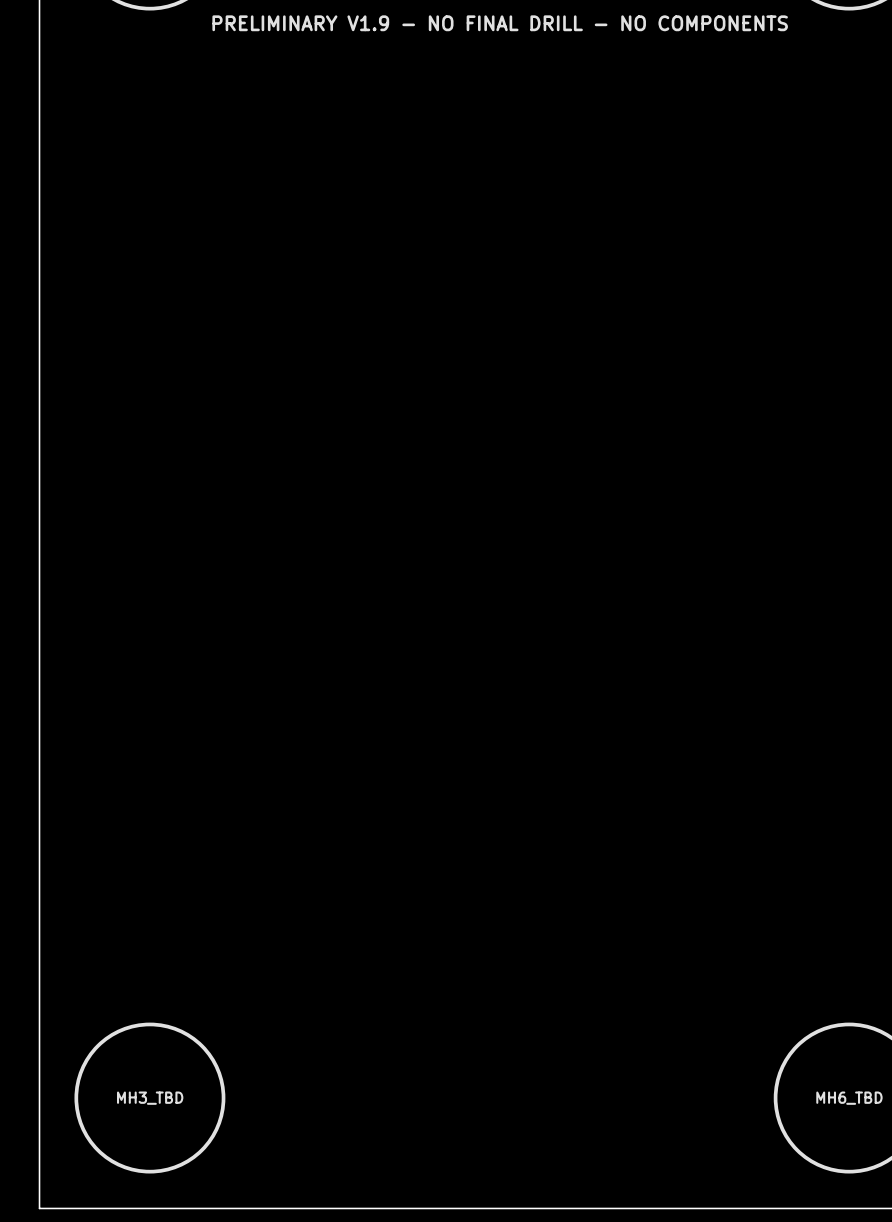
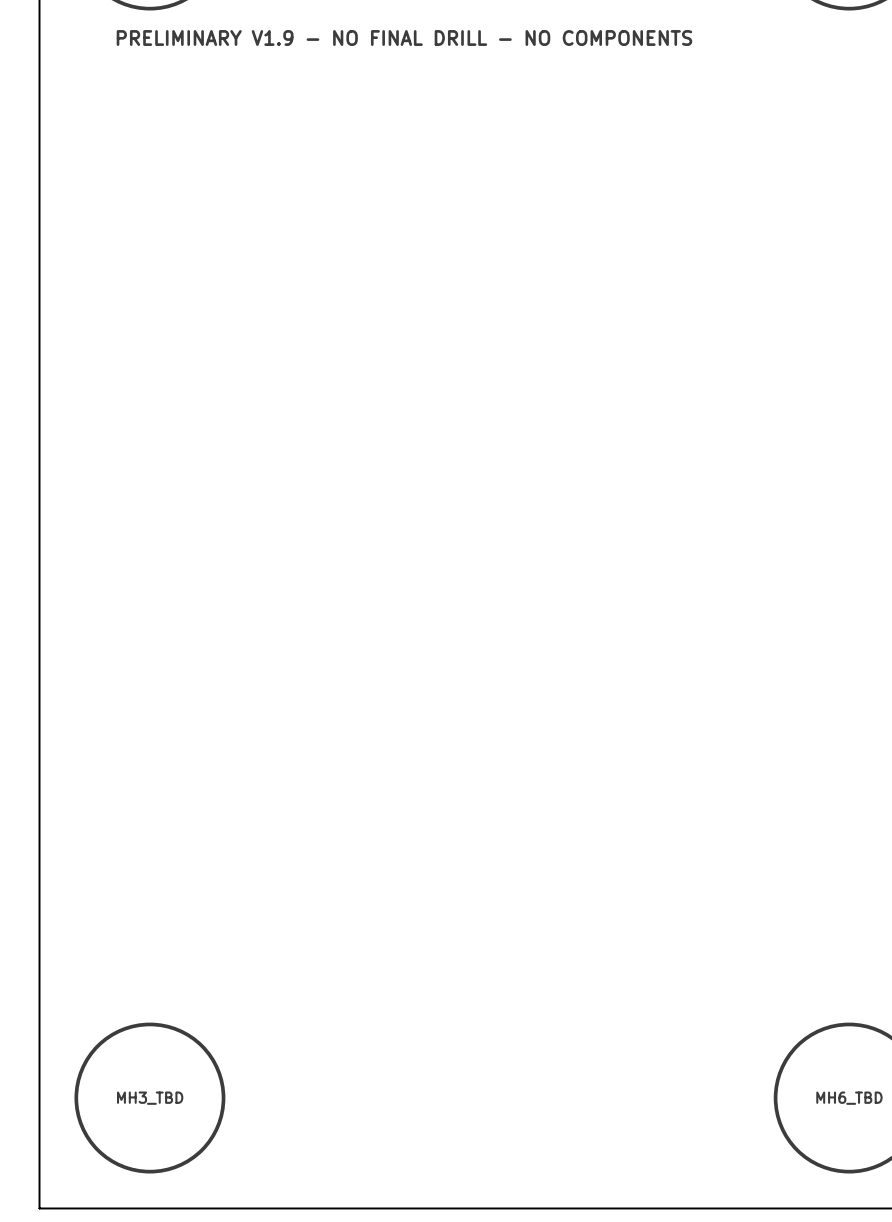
text position: PRELIMINARY V1.9 - NO FINAL DRILL - NO COMPONENTS (500, 23) -> PRELIMINARY V1.9 - NO FINAL DRILL - NO COMPONENTS (404, 38)

